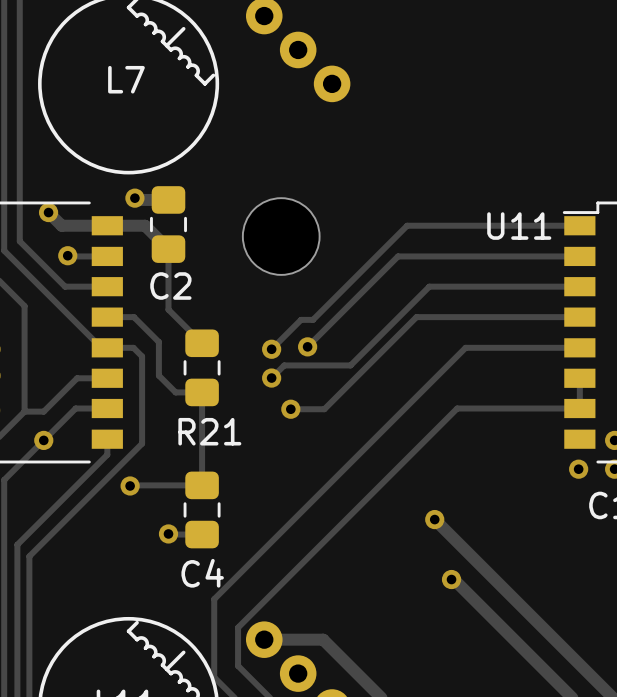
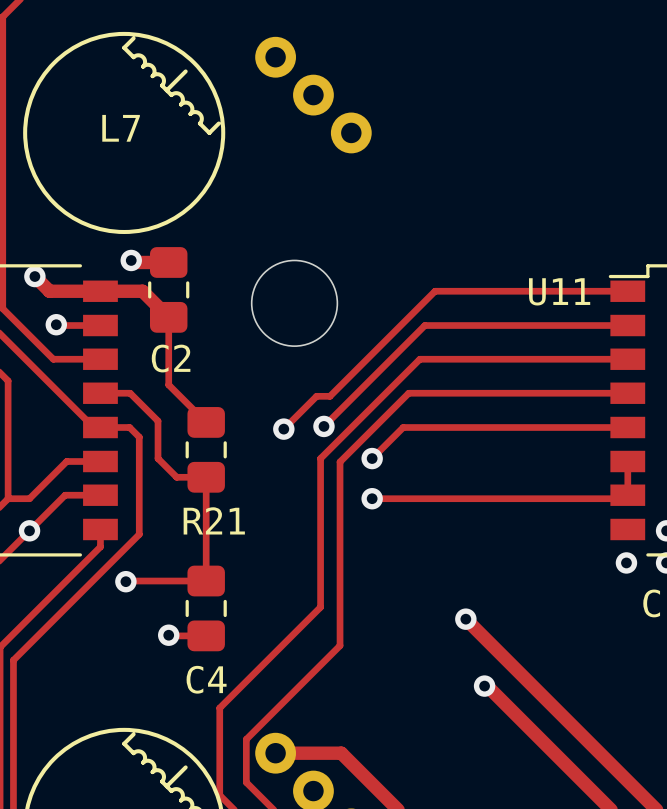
track: (429, 286) (350, 365) (284, 365) (271, 378) -> none
track: (416, 317) (324, 409) (290, 409) -> none
track: (465, 347) (304, 508) -> (459, 359) (419, 359) (320, 458) (320, 607)
track: none -> (500, 427) (403, 427) (372, 458)
via: none -> (372, 458)
via: (271, 378) -> none
track: (579, 408) (457, 408) (238, 627) -> (445, 393) (408, 393) (340, 461) (340, 645) (246, 739)
track: none -> (627, 495) (624, 498) (372, 498)
via: (290, 409) -> none
via: none -> (372, 498)

